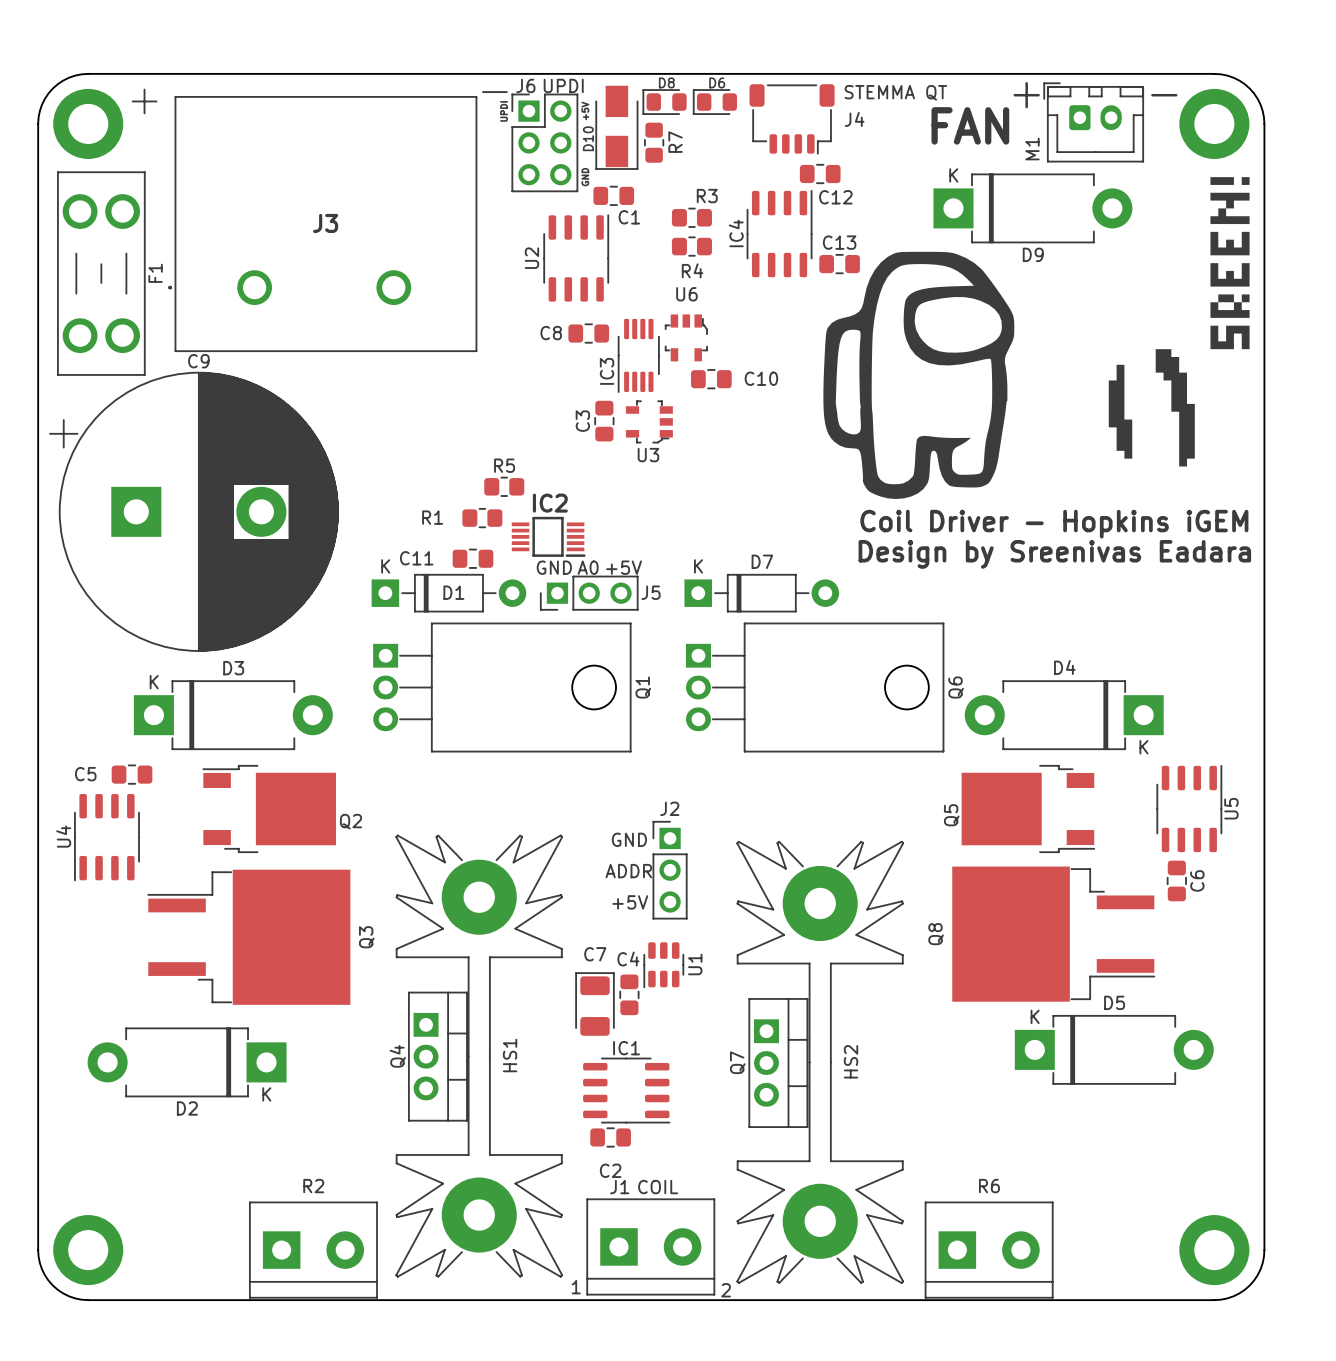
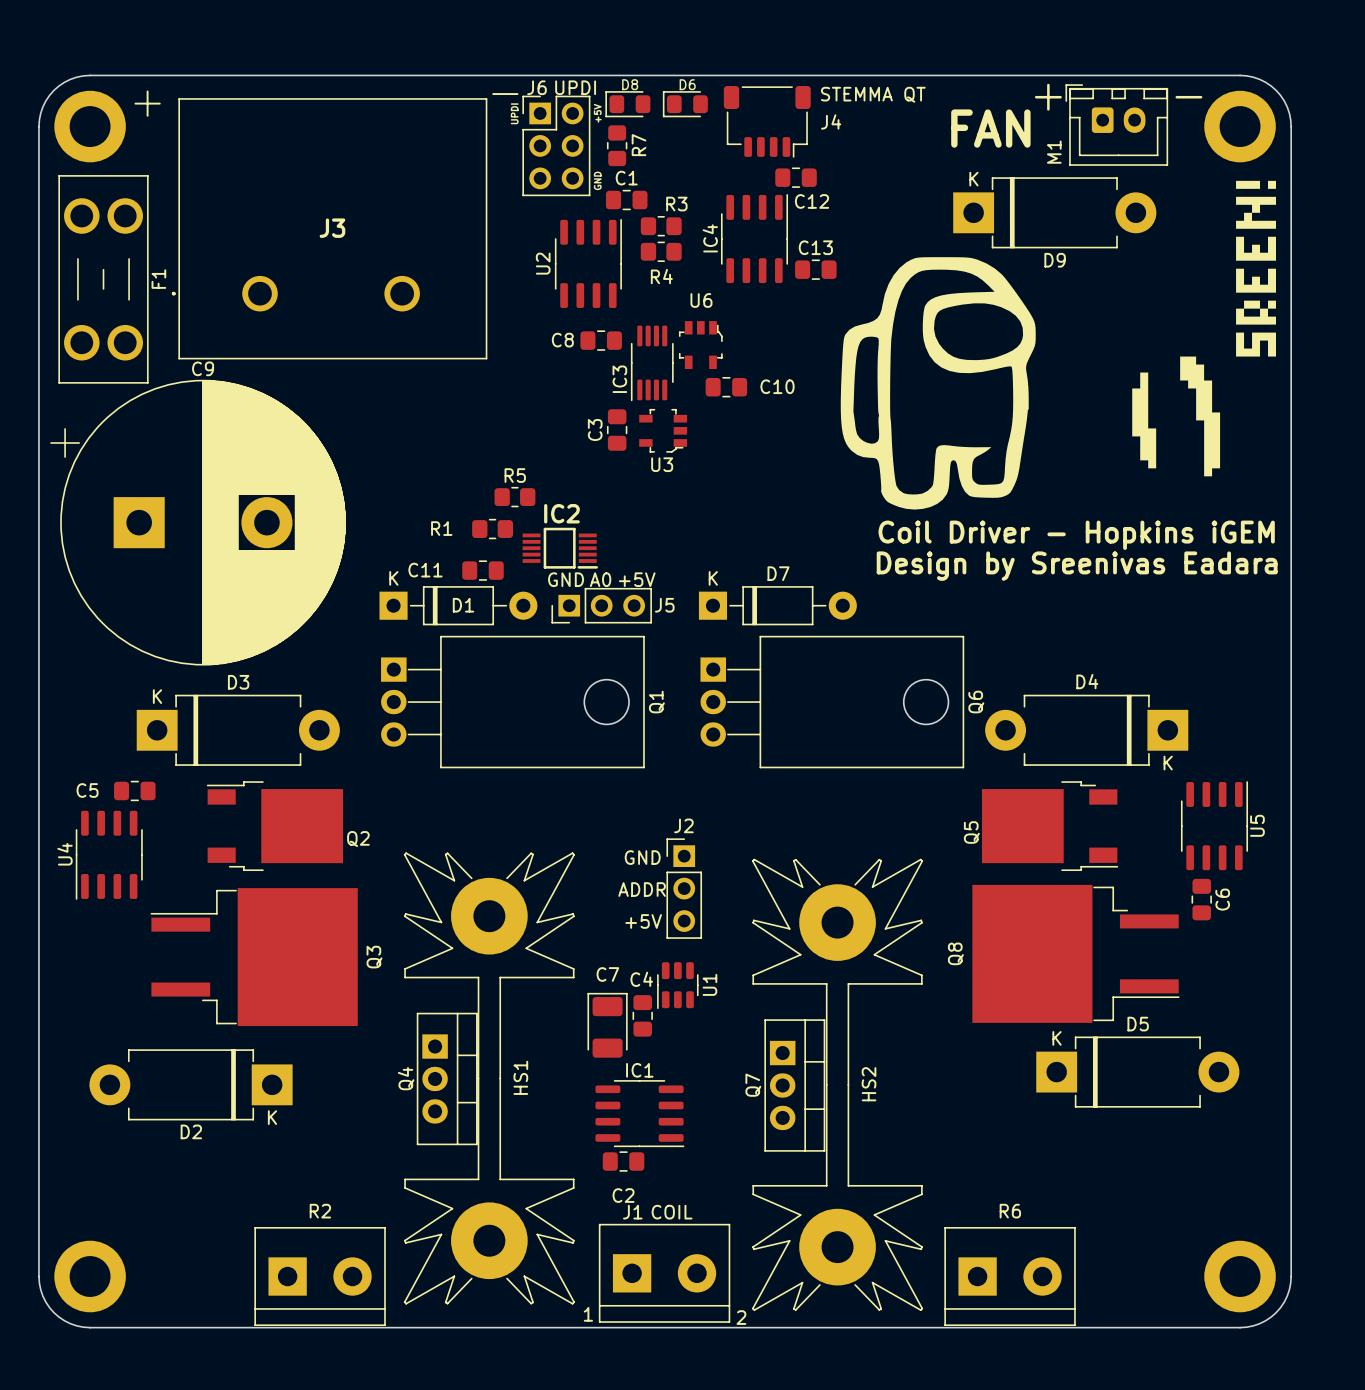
text position: STEMMA QT (895, 92) -> STEMMA QT (873, 94)
D8 position: (664, 102) -> (627, 104)
D6 position: (714, 102) -> (685, 104)
J4 position: (792, 119) -> (767, 121)
D10: (616, 127) -> none
R7 position: (654, 142) -> (617, 145)
C12 position: (820, 173) -> (796, 177)
C1 name position: C1 (629, 217) -> C1 (626, 178)
R3 position: (691, 217) -> (661, 226)
IC4 position: (779, 233) -> (754, 238)
R4 position: (691, 246) -> (661, 251)
C13 position: (839, 264) -> (815, 269)

